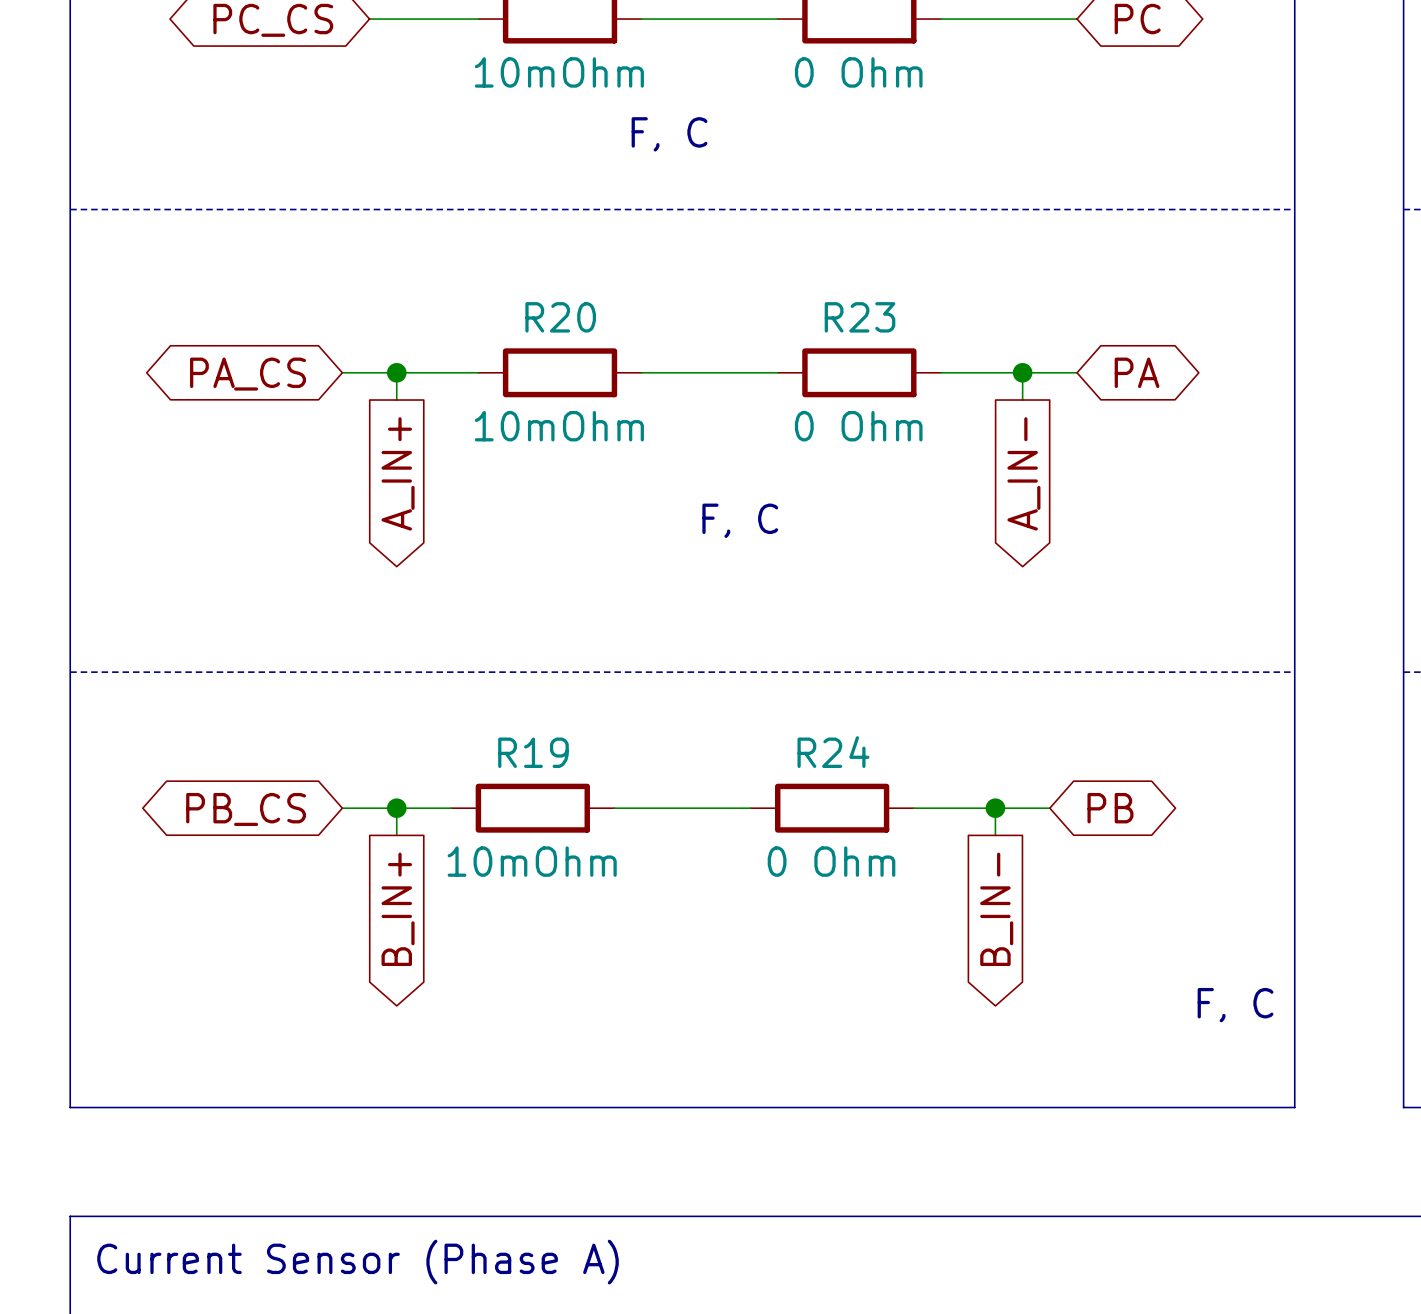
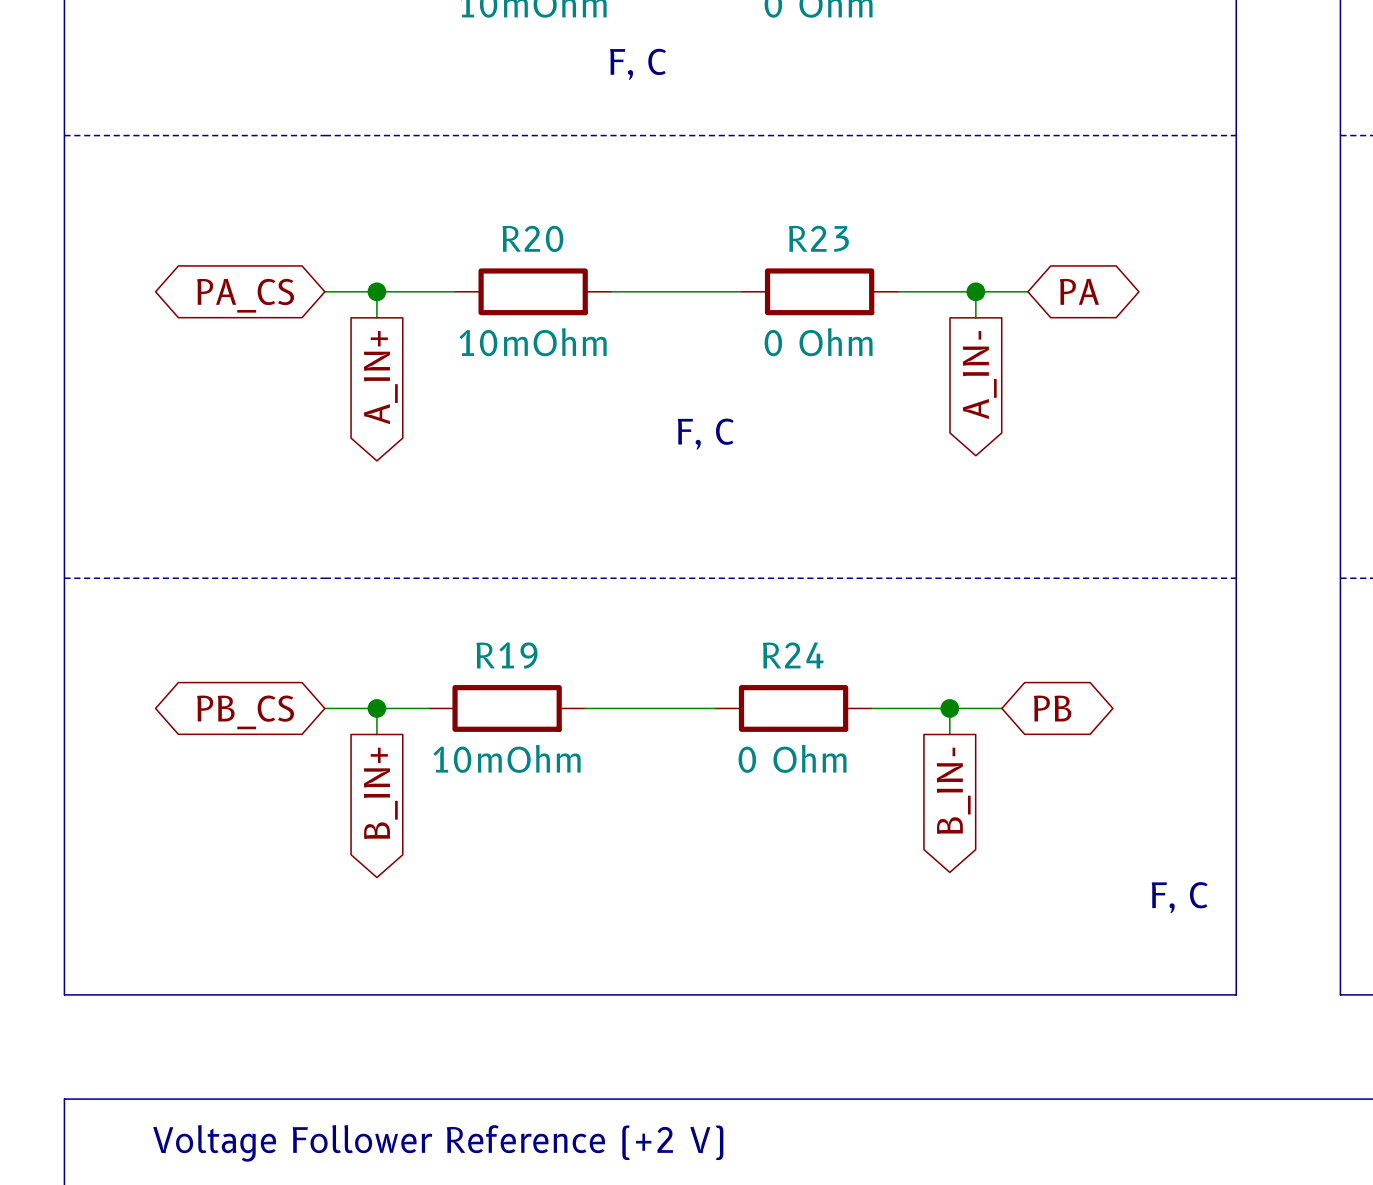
text: Current Sensor (Phase A) (358, 1262) -> none
text: none -> Voltage Follower Reference (+2 V) (438, 1143)

